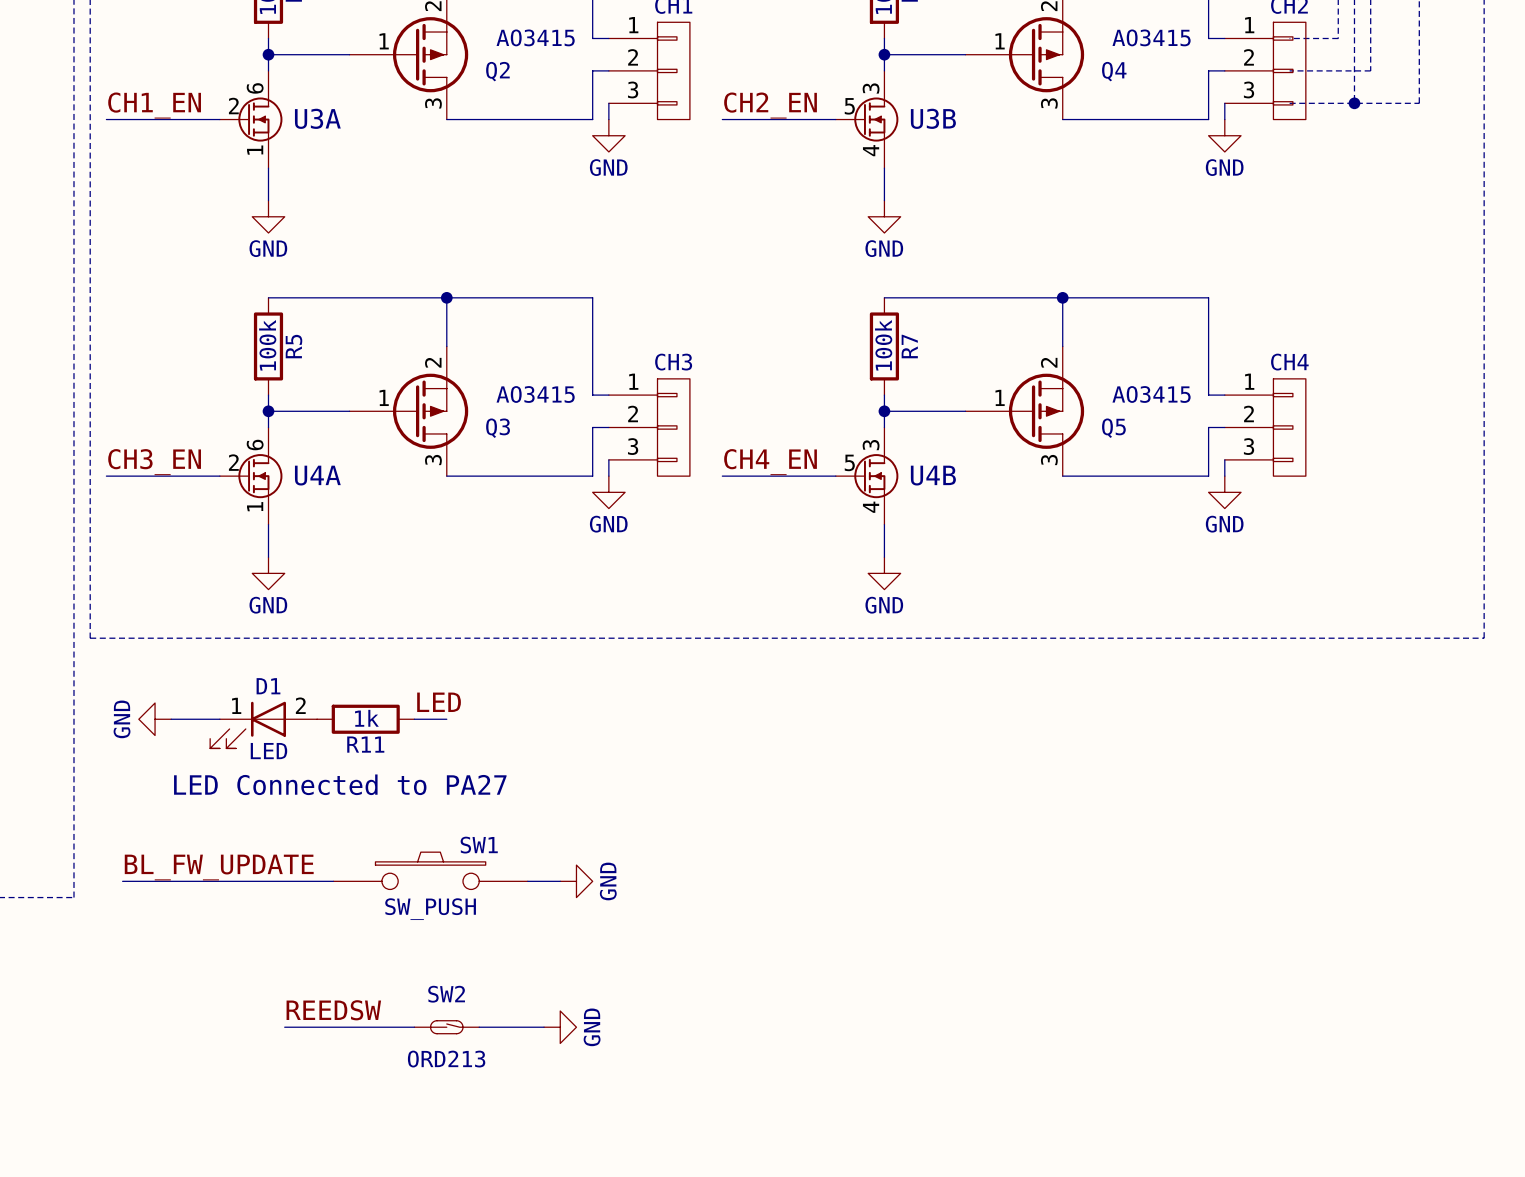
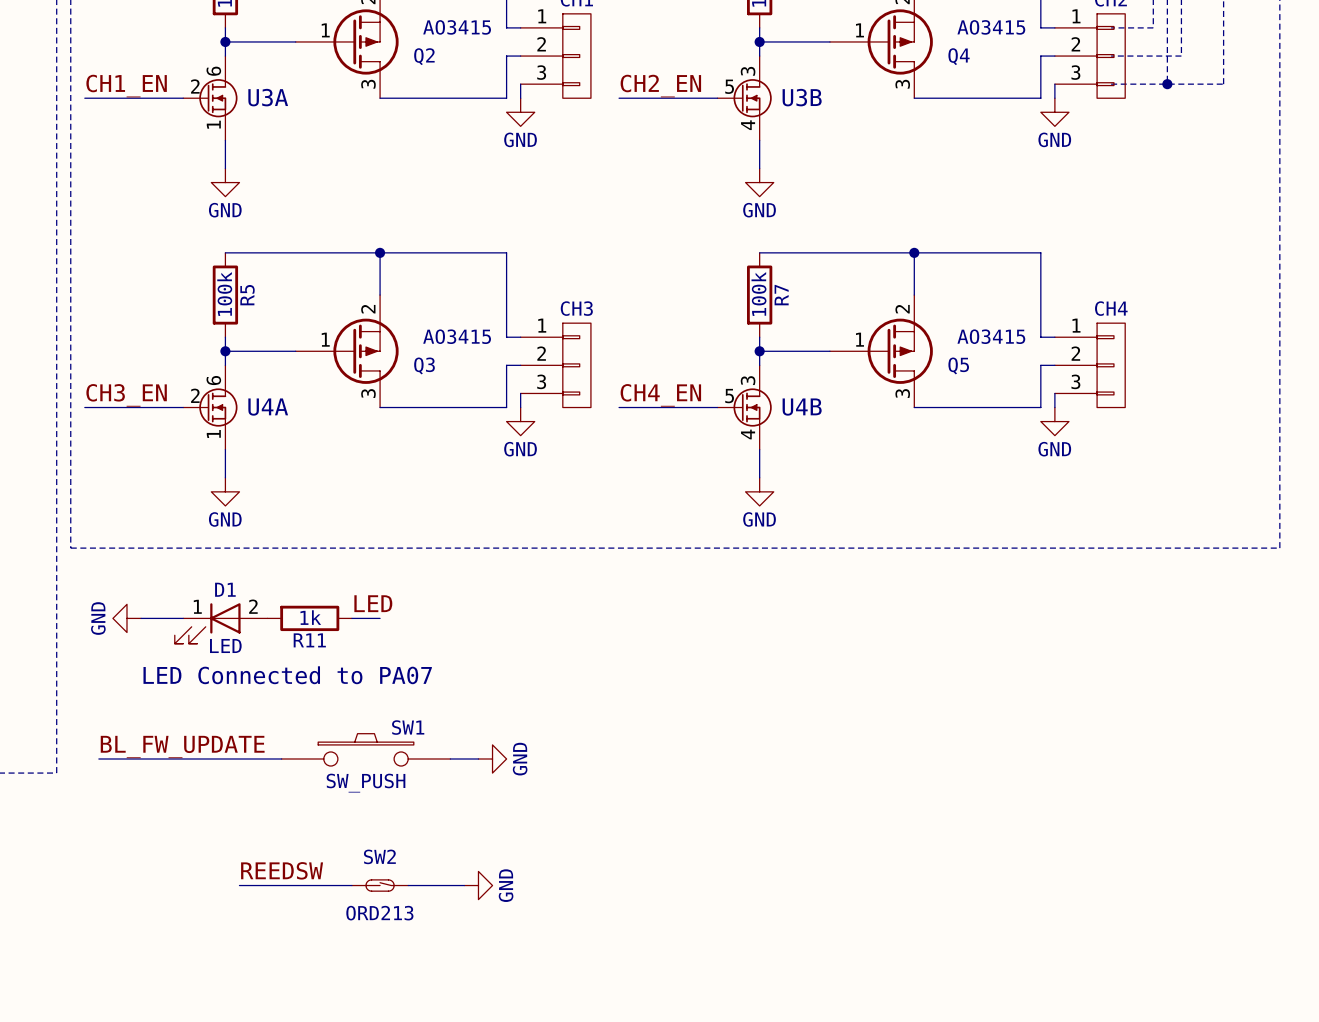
text: LED Connected to PA27 (340, 784) -> LED Connected to PA07 (287, 675)

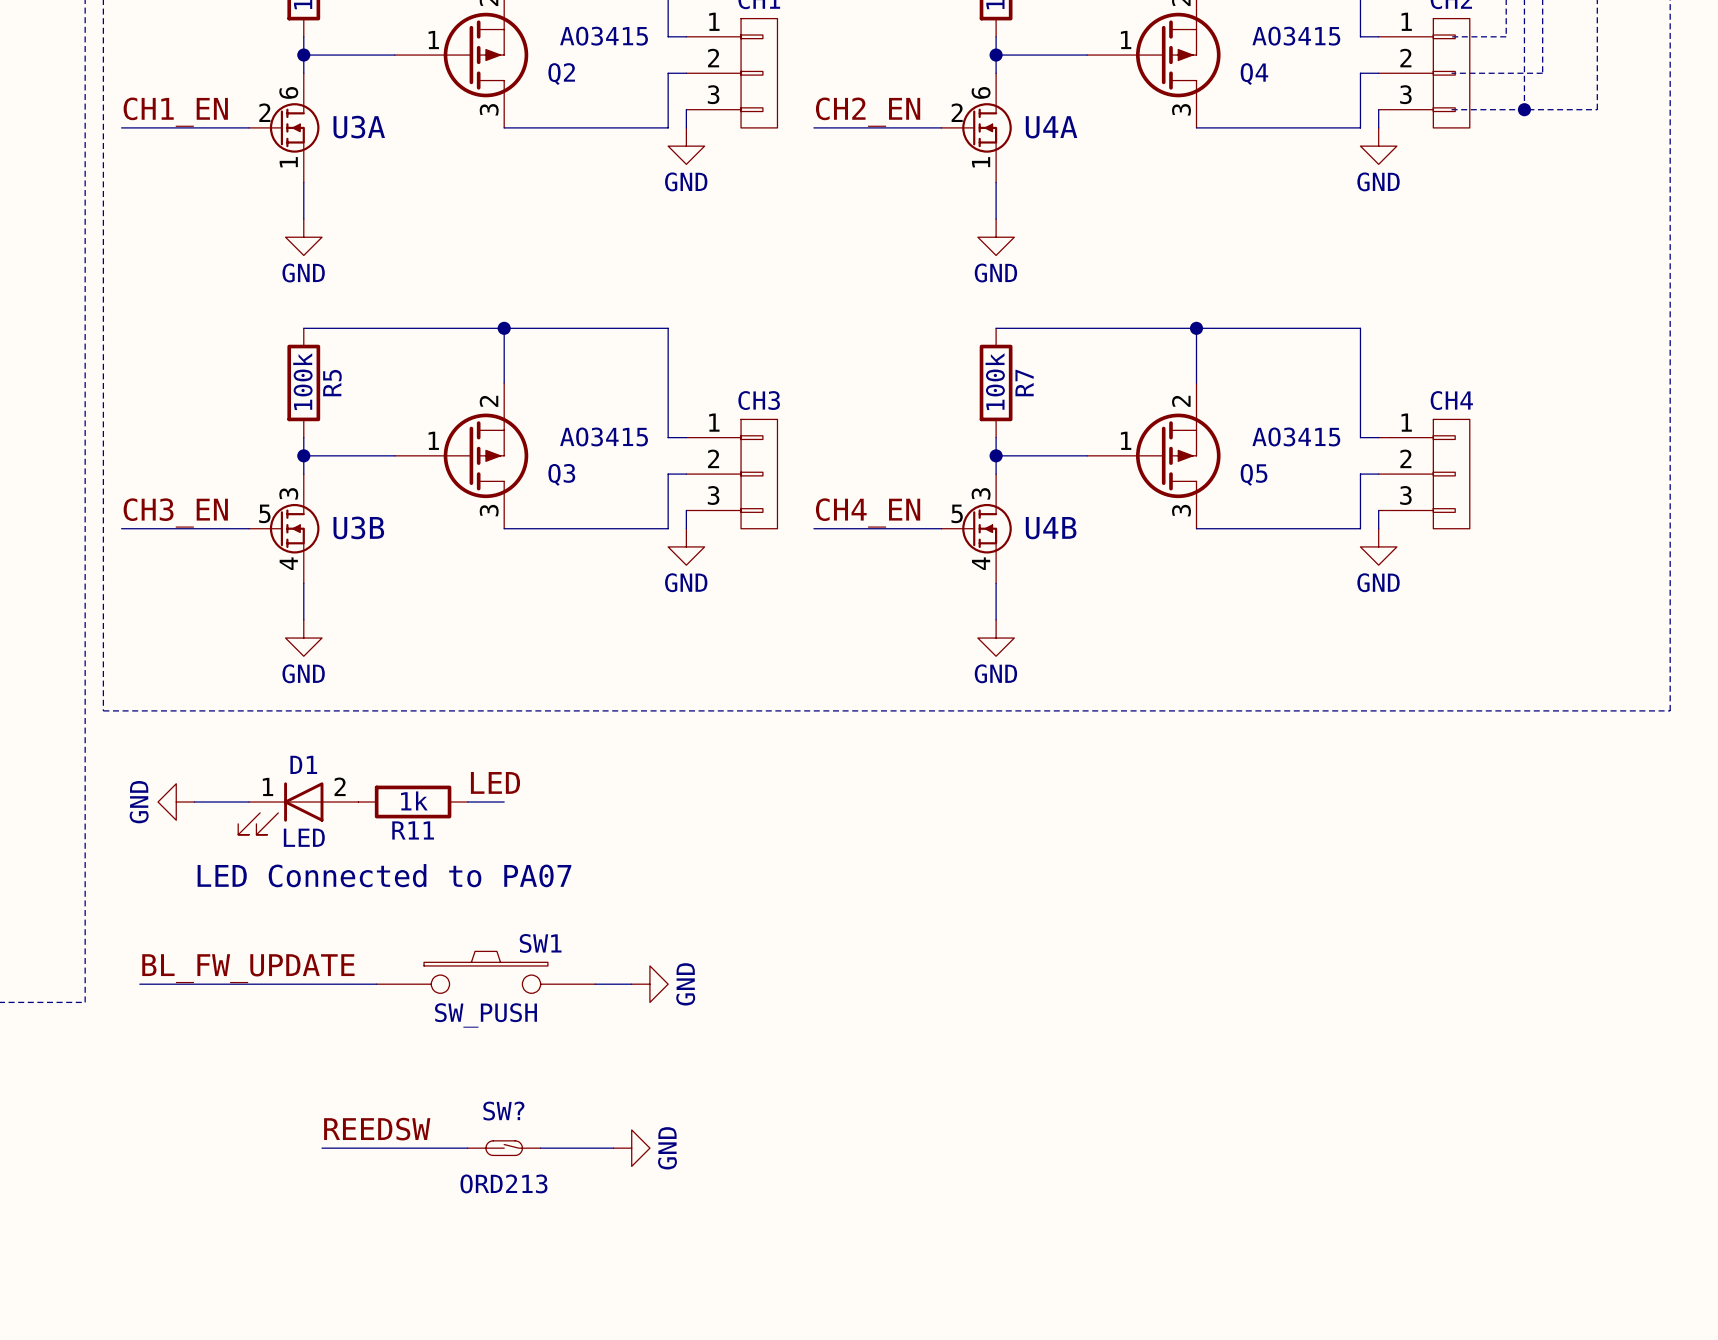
U3B position: (744, 98) -> (284, 528)
U4A position: (210, 407) -> (976, 127)
SW2 name: SW2 (379, 856) -> SW? (503, 1111)

